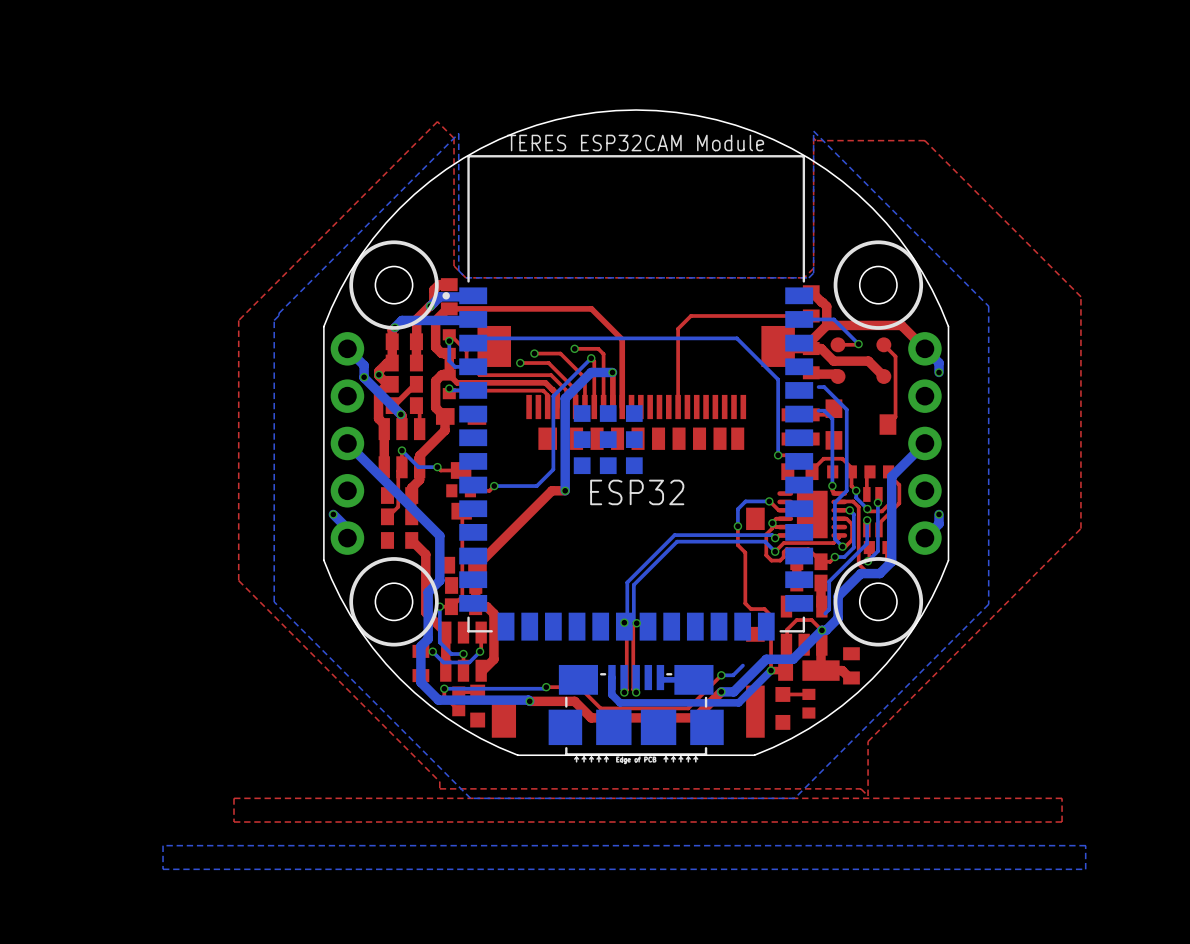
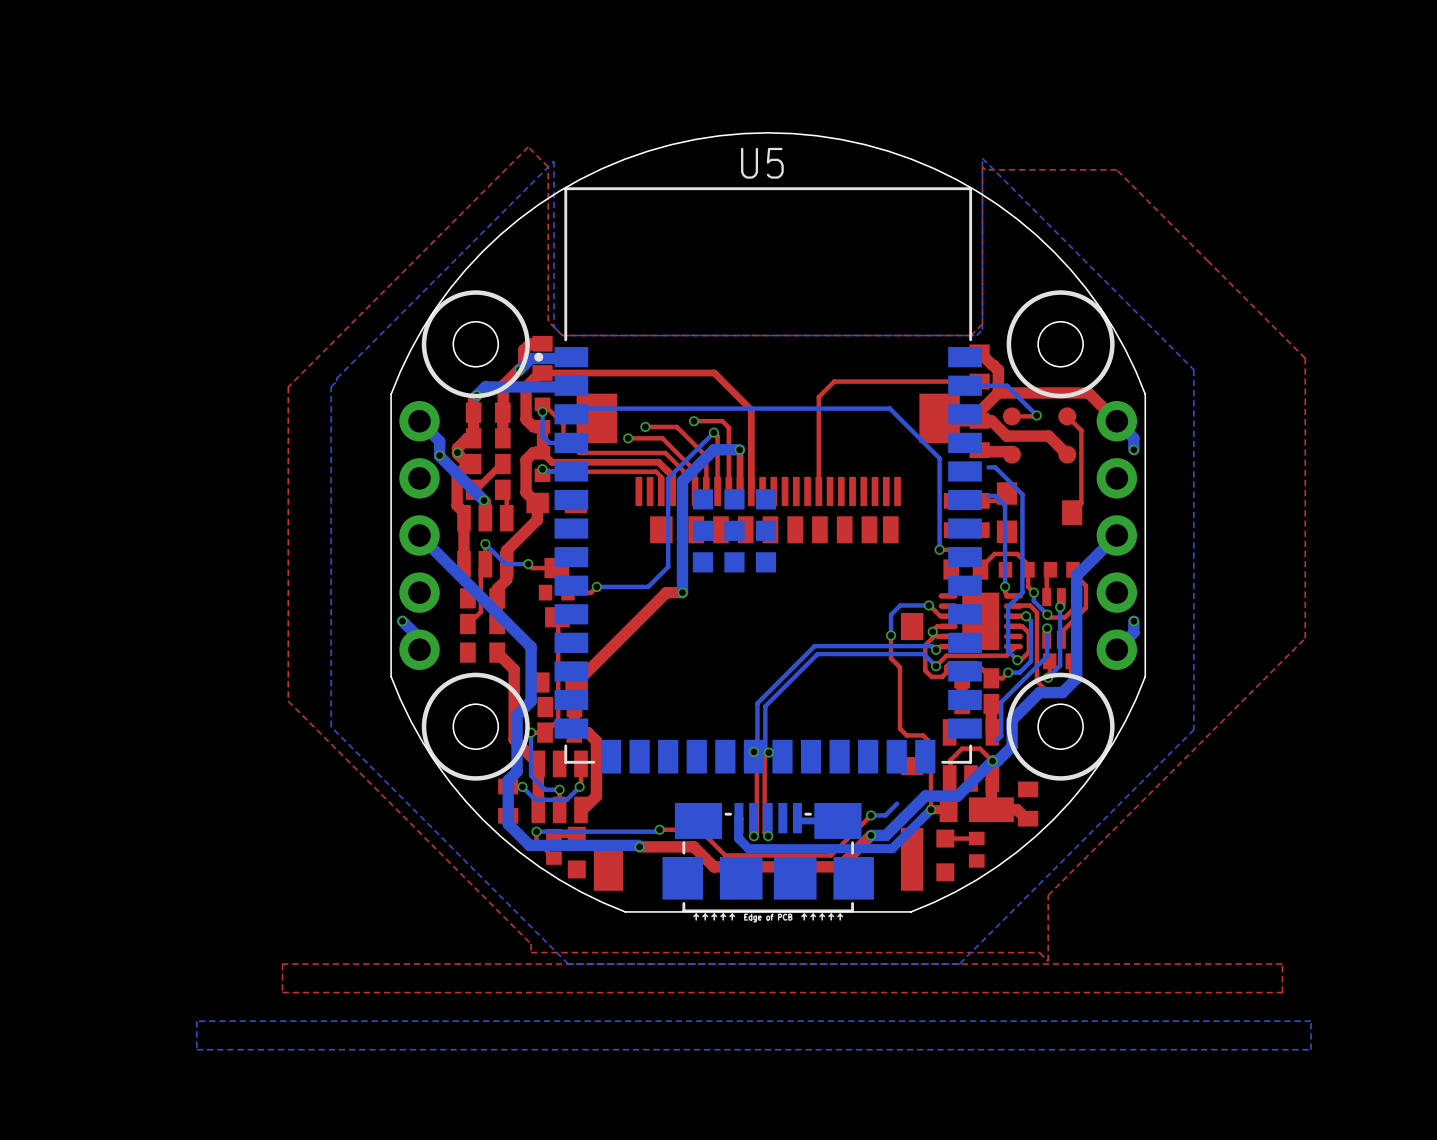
text: TERES ESP32CAM Module (635, 143) -> none
ESP32 name: ESP32 (637, 492) -> U5 (762, 163)

